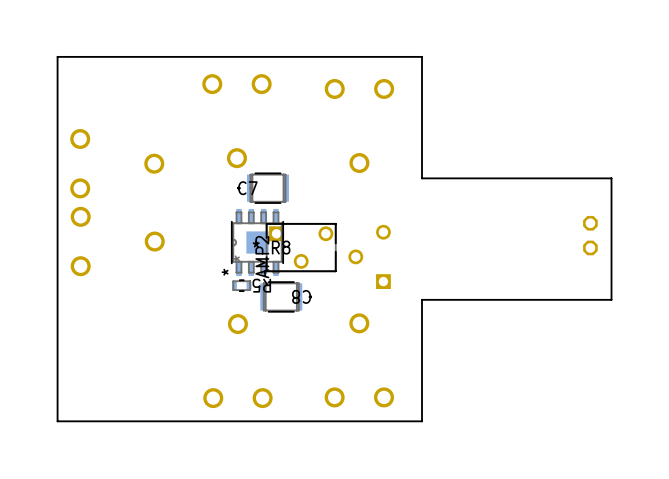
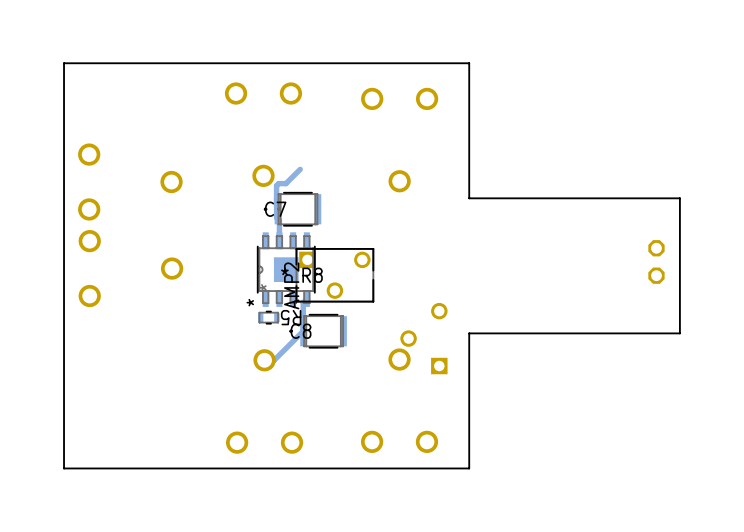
track: none -> (300, 169) (285, 183) (278, 183) (276, 185) (276, 217) (279, 220) (279, 240)
part position: (369, 256) -> (423, 338)
track: none -> (306, 299) (303, 302) (303, 331) (274, 360) (264, 360)
C8 rotation: 0° (286, 296) -> 180° (318, 331)

